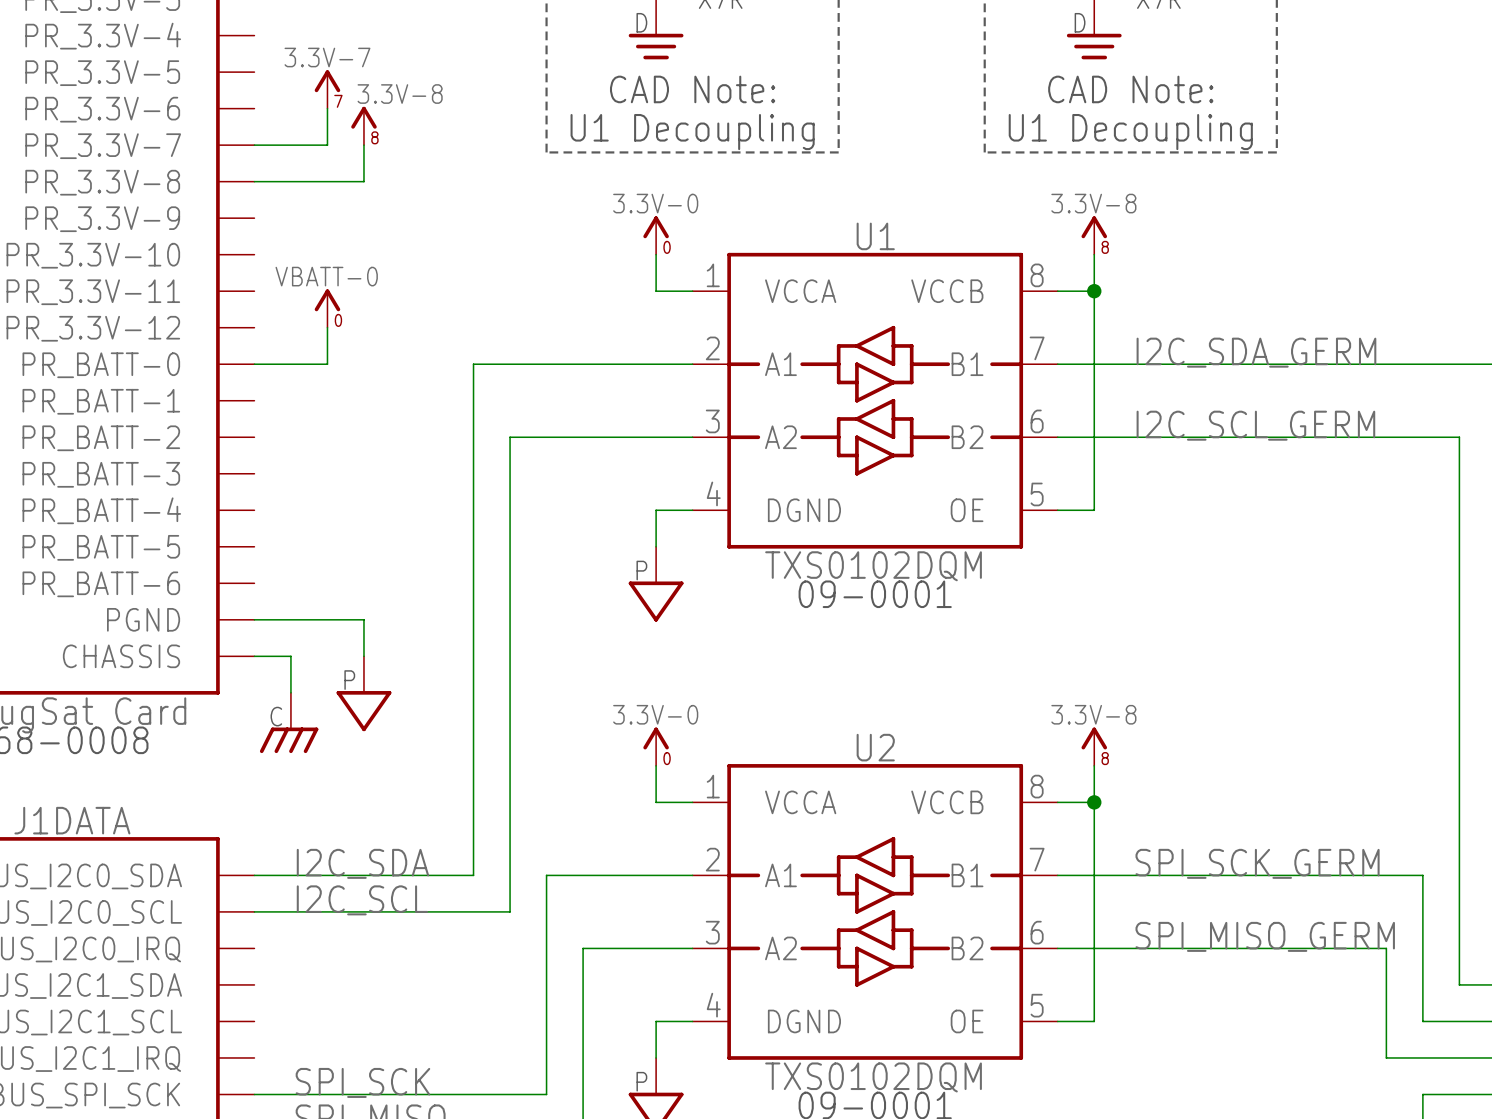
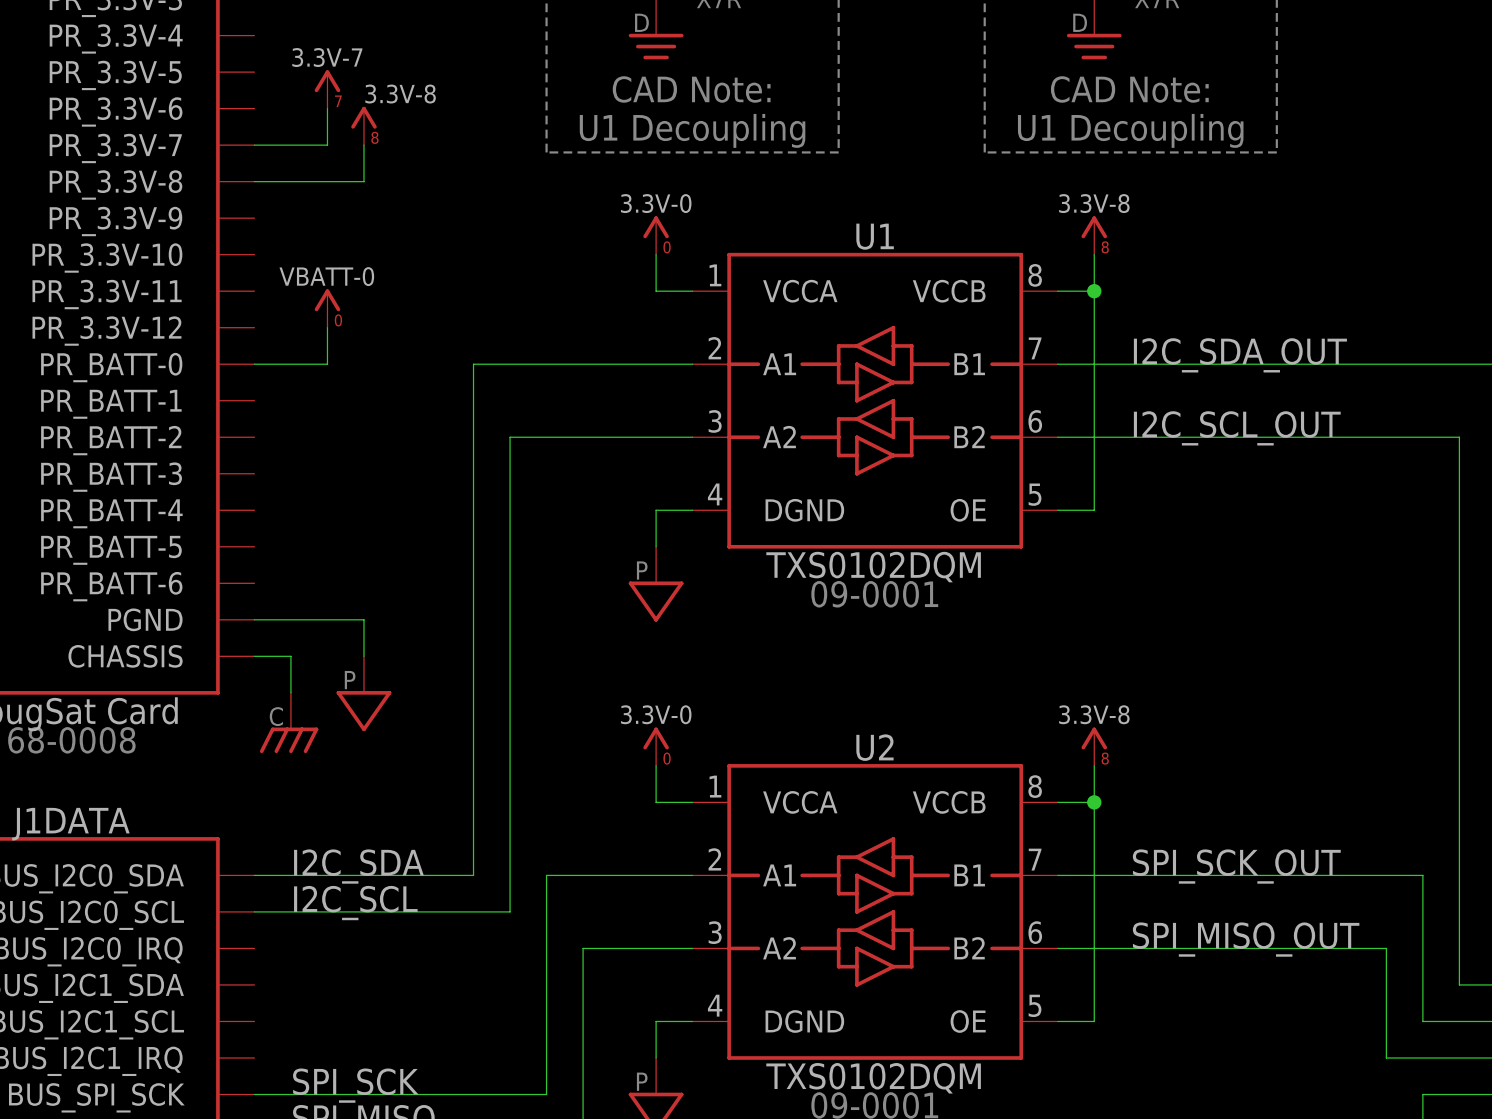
label: I2C_SDA_GERM (1256, 352) -> I2C_SDA_OUT (1240, 355)
label: I2C_SCL_GERM (1255, 425) -> I2C_SCL_OUT (1237, 428)
label: SPI_SCK_GERM (1257, 863) -> SPI_SCK_OUT (1236, 866)
label: SPI_MISO_GERM (1265, 936) -> SPI_MISO_OUT (1246, 939)

